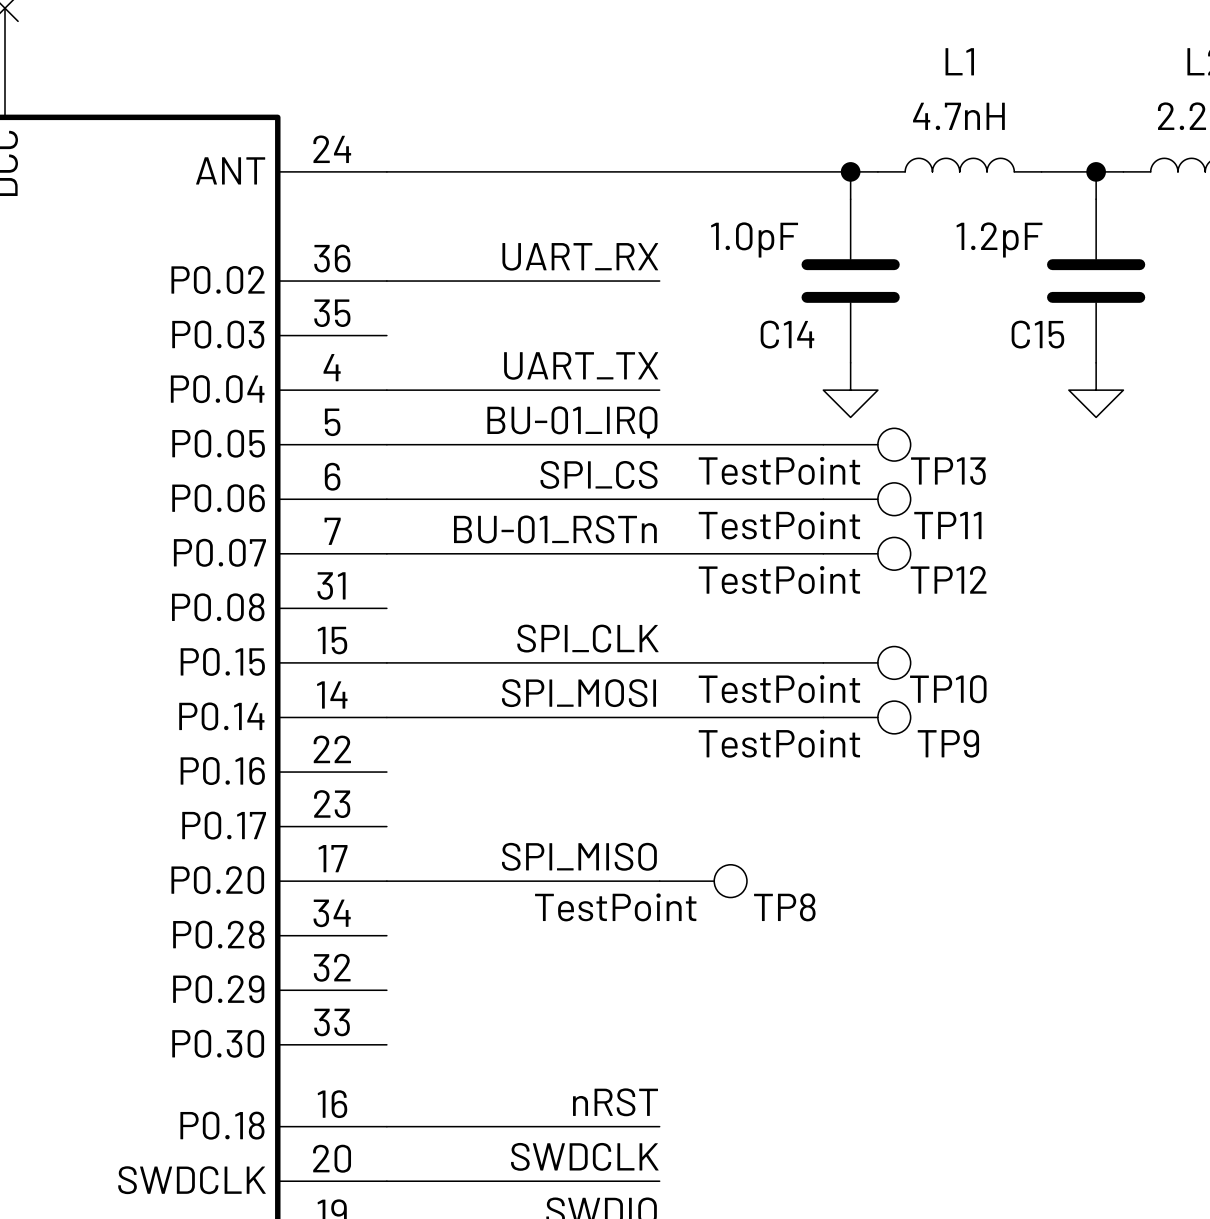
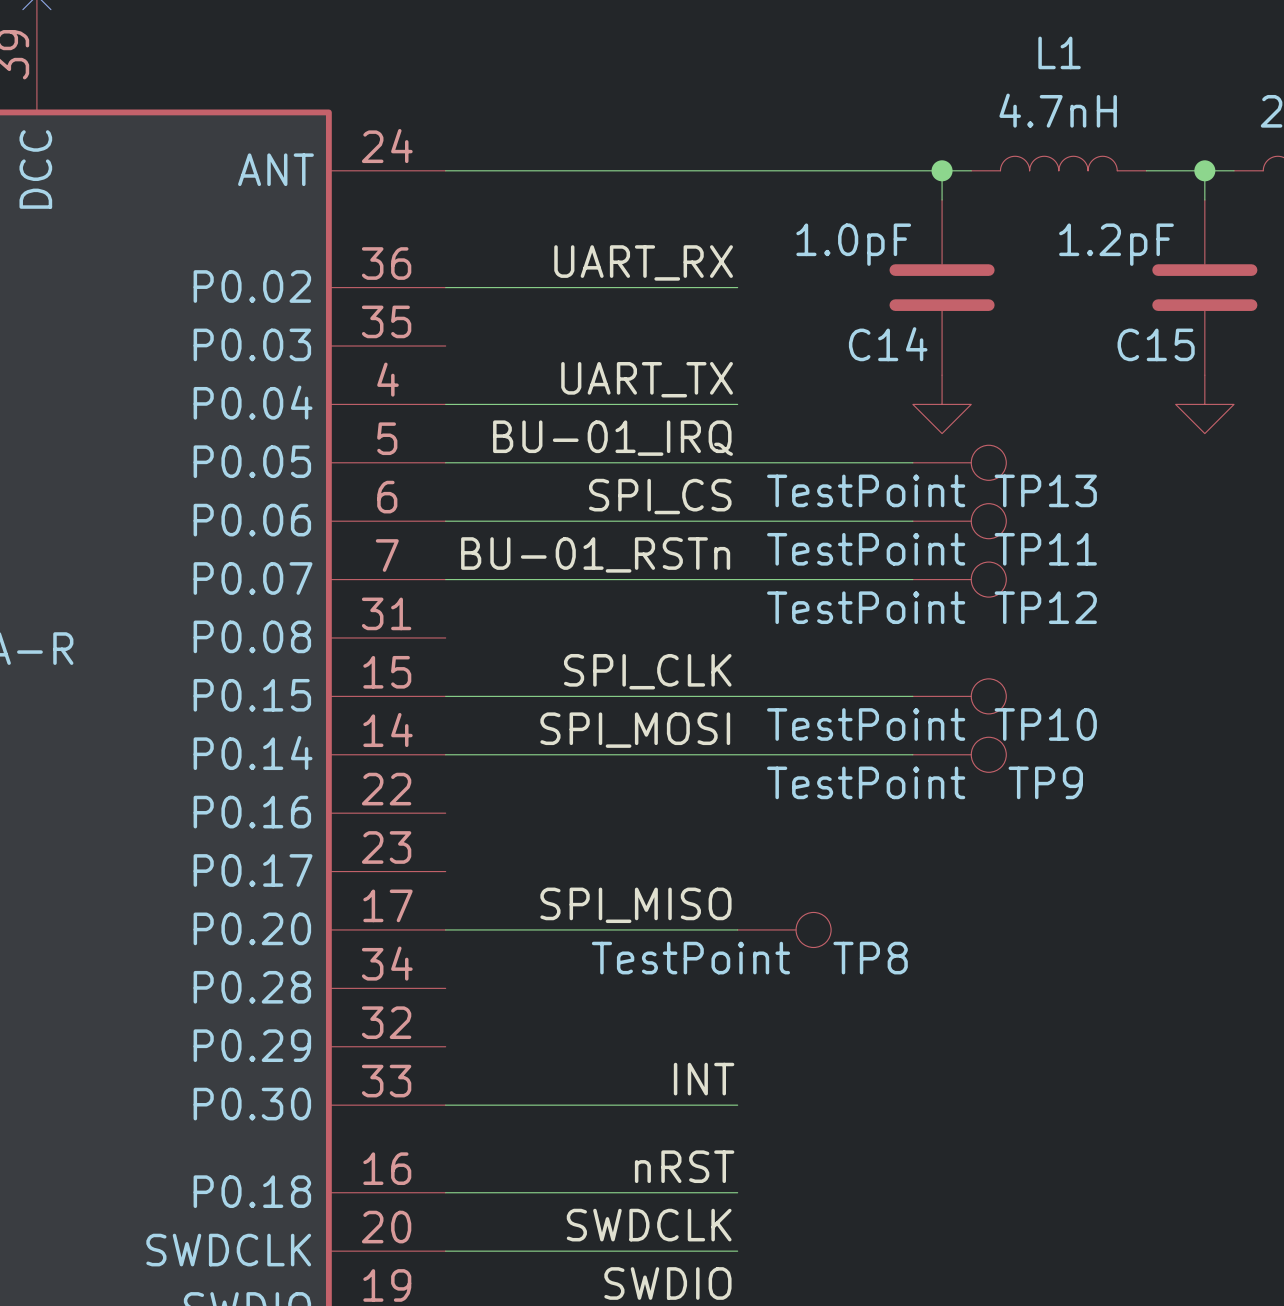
label: none -> INT (704, 1079)
wire: none -> (445, 1105) (737, 1105)

